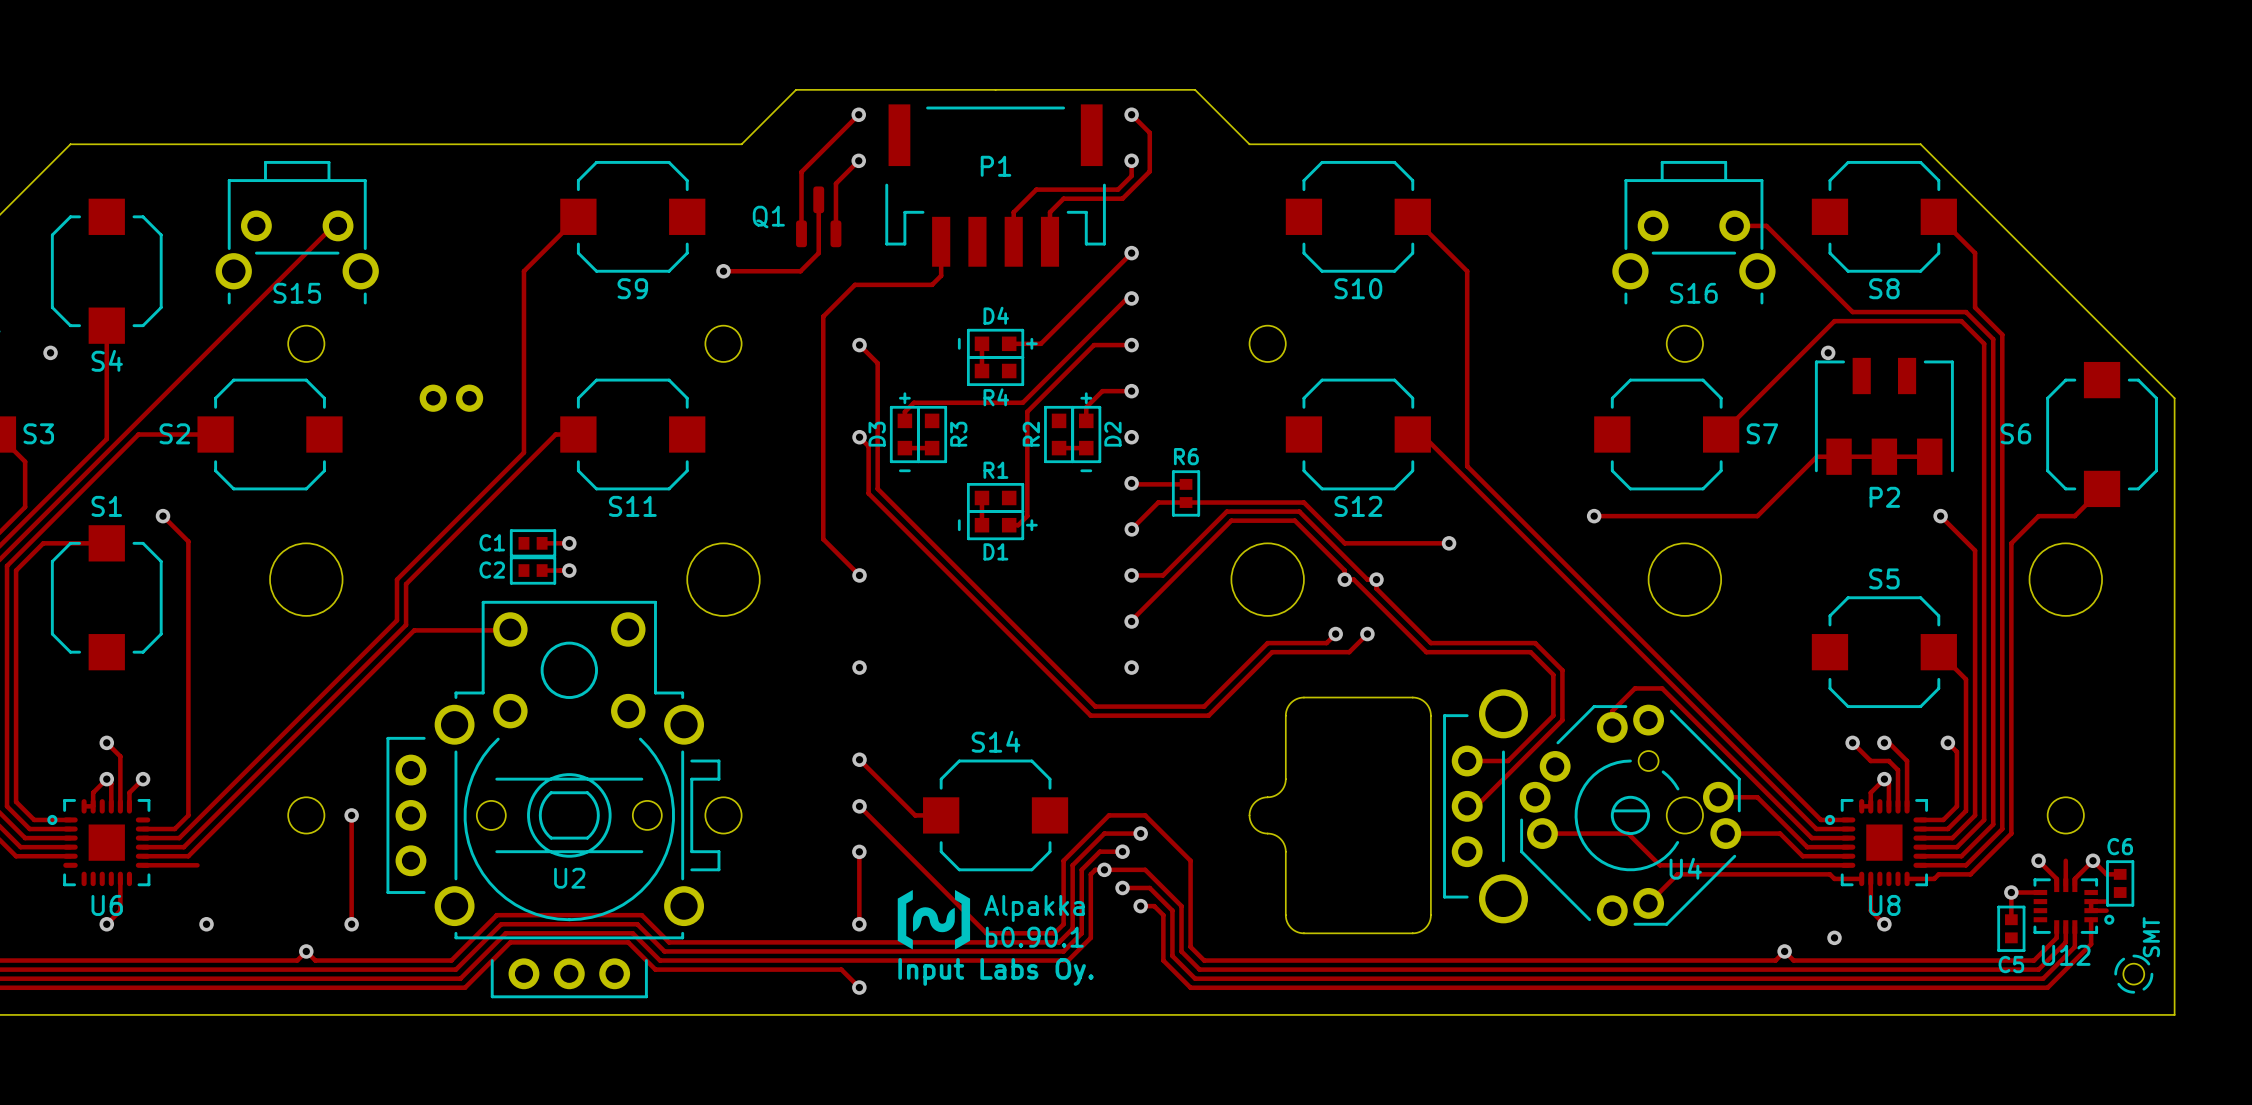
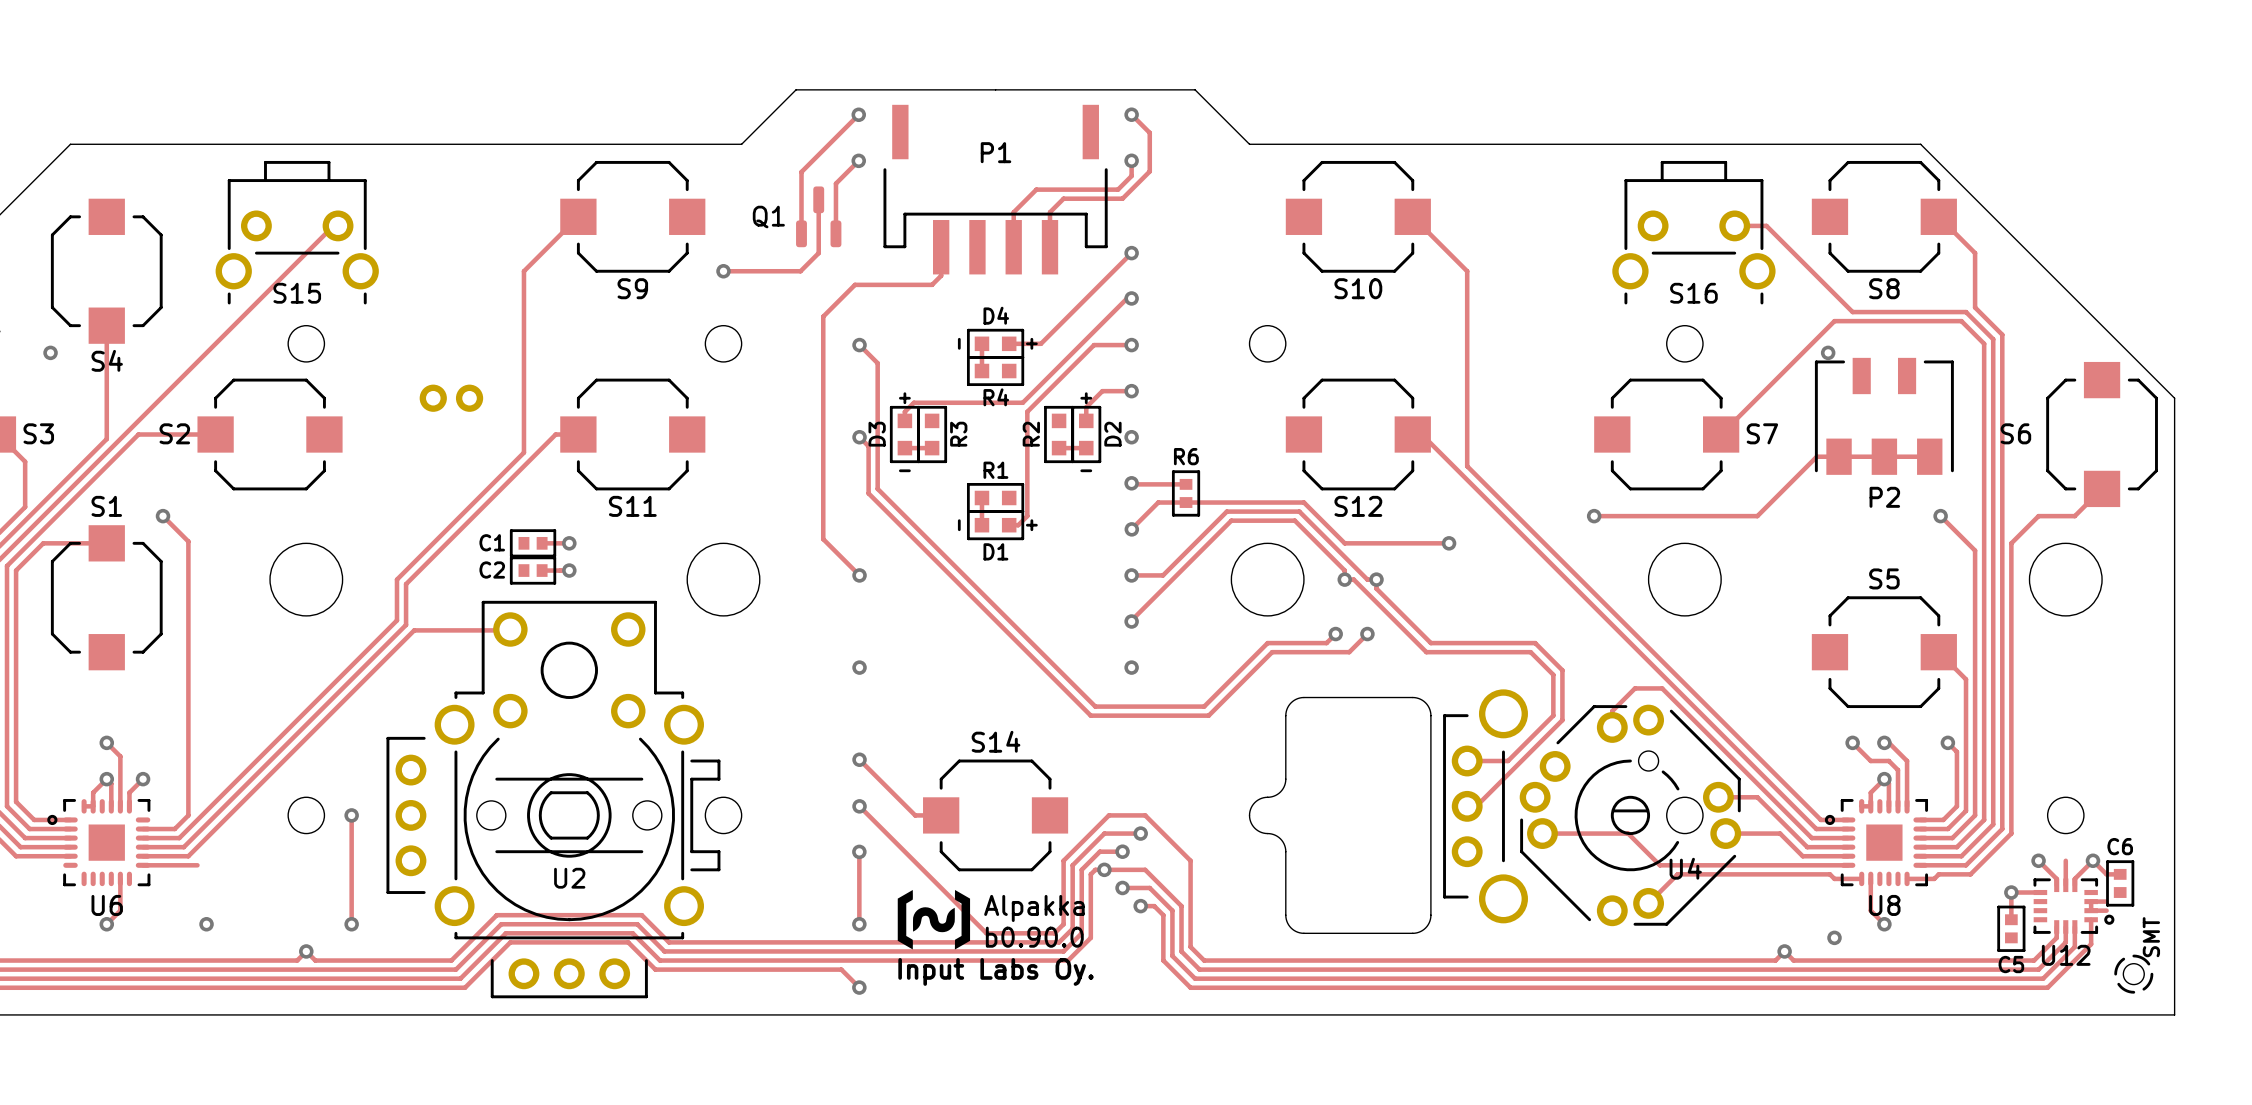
P1 footprint: [885, 104, 1106, 267] -> [883, 104, 1108, 275]
text: b0.90.1 (1034, 937) -> b0.90.0 (1034, 937)

